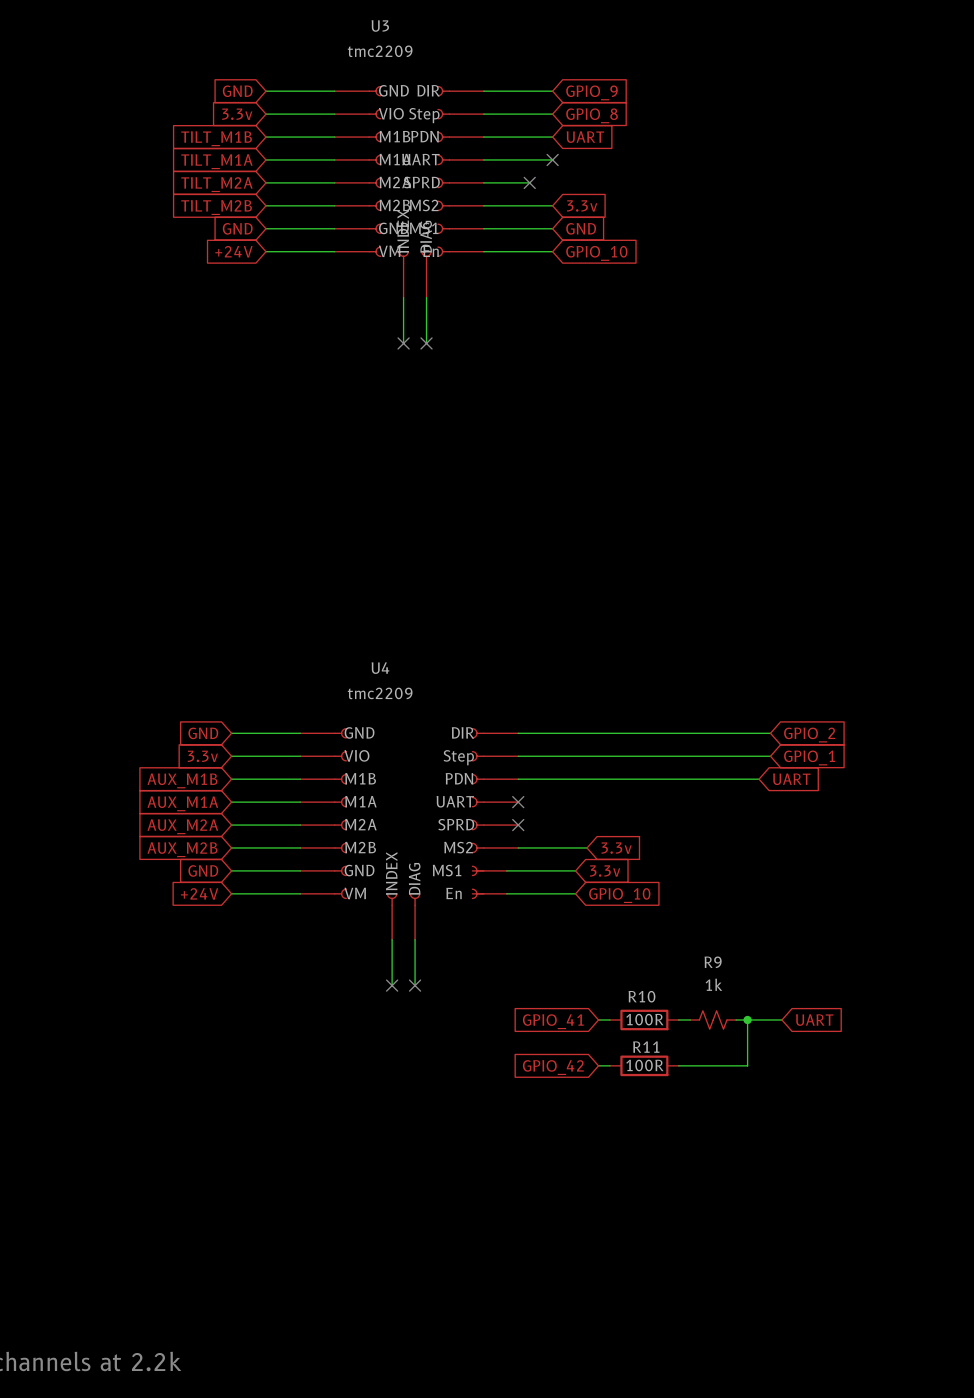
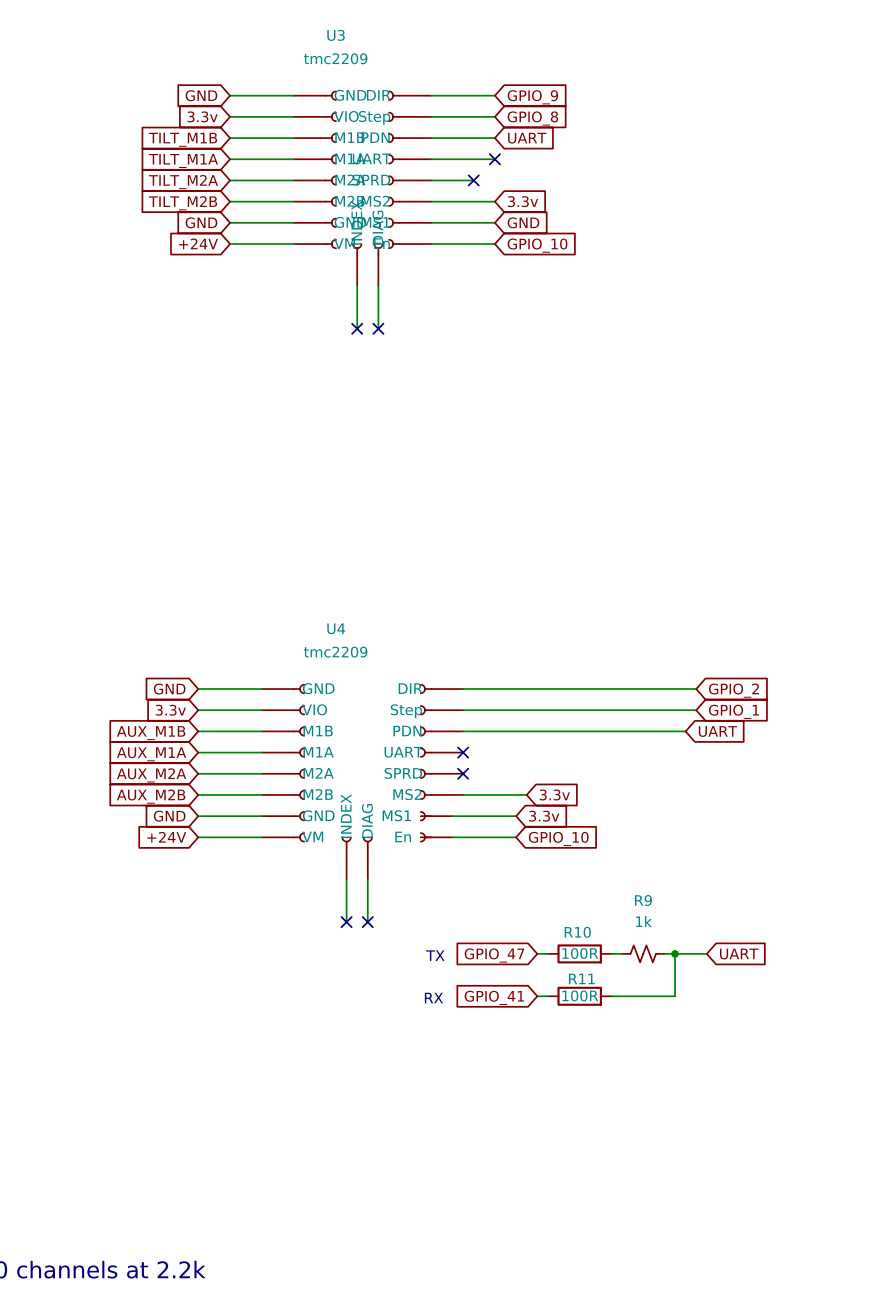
text: none -> TX (435, 955)
global label: GPIO_41 (553, 1021) -> GPIO_47 (494, 955)
text: none -> RX (433, 998)
global label: GPIO_42 (553, 1067) -> GPIO_41 (494, 997)

